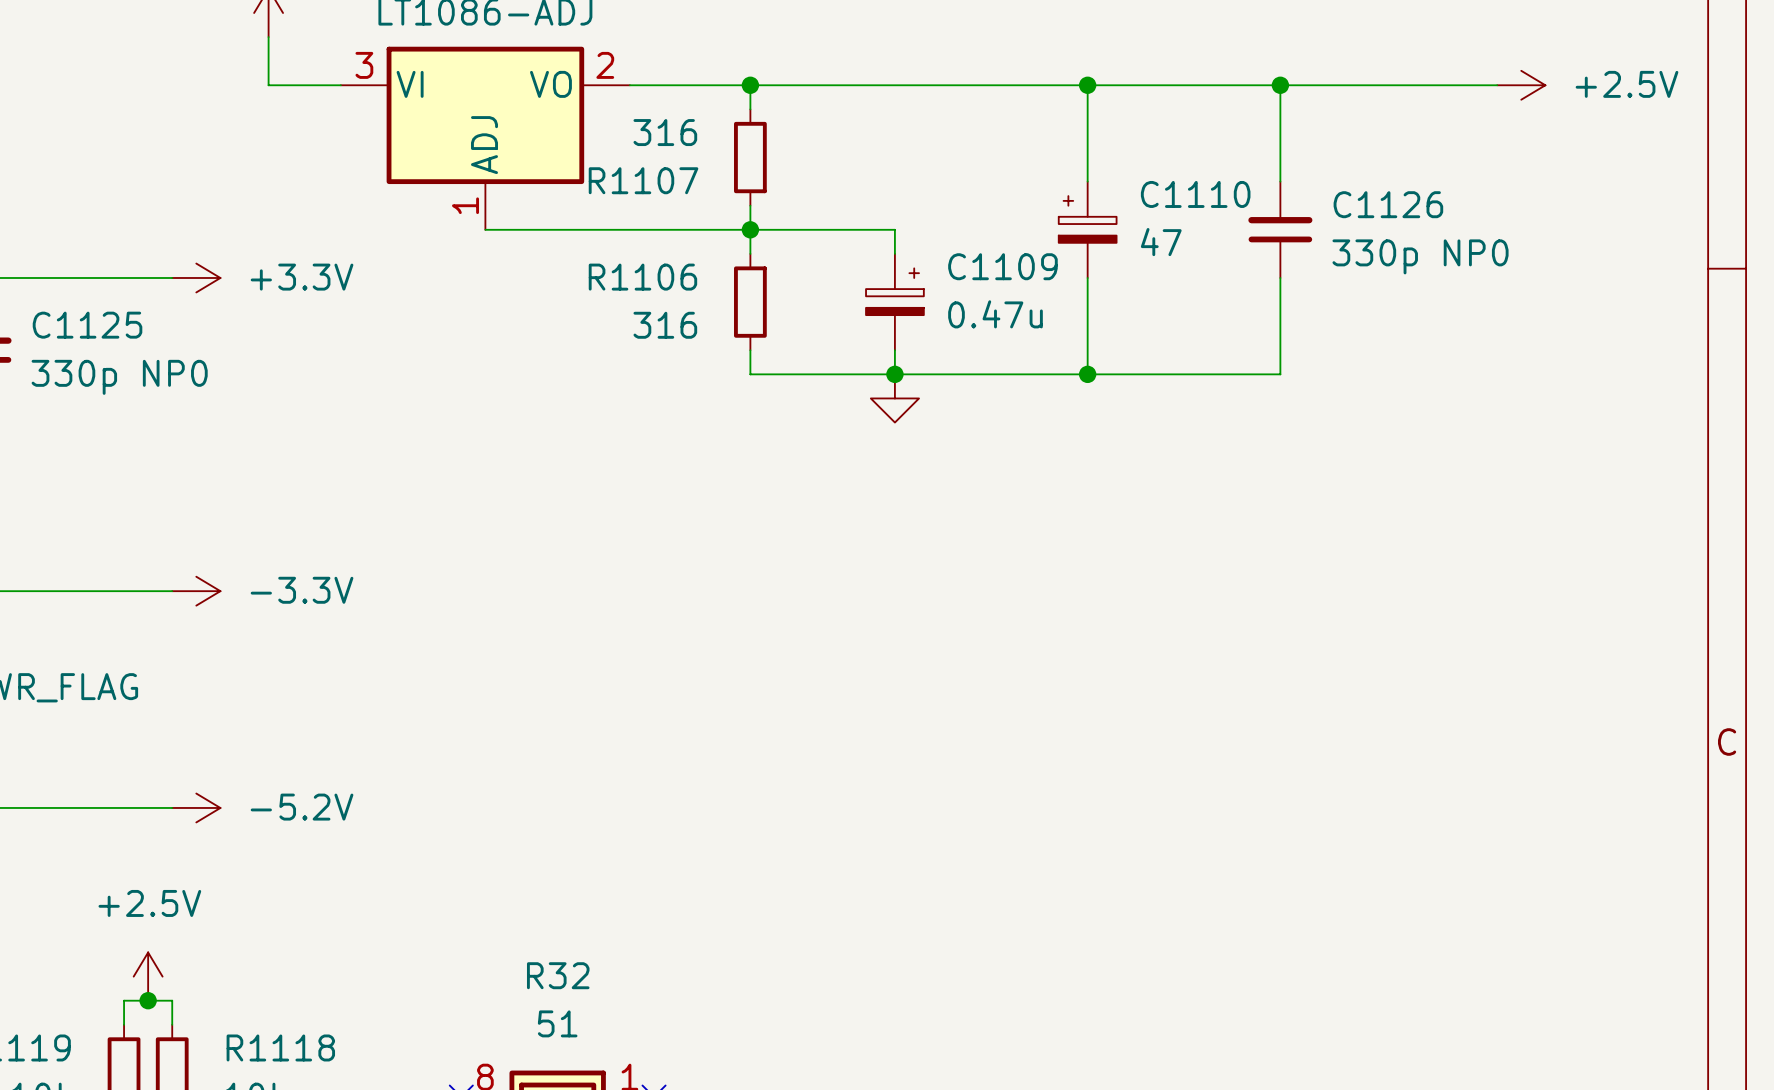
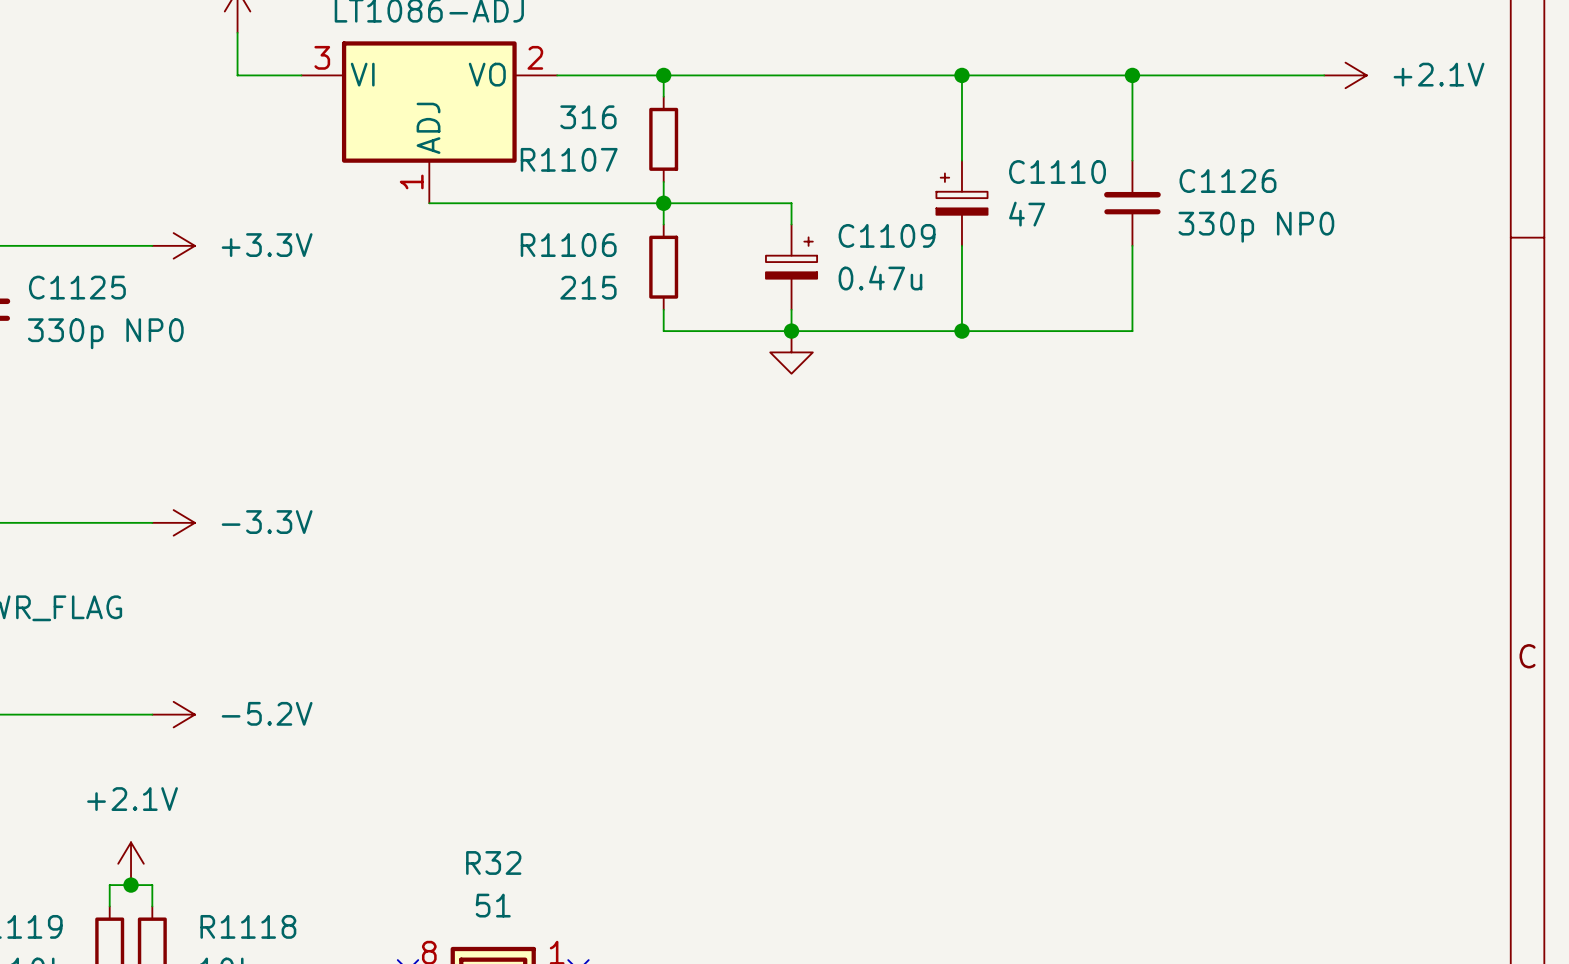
power symbol: +2.5V (1521, 85) -> +2.1V (1345, 75)
R1106 value: 316 (665, 325) -> 215 (588, 287)
power symbol: +2.5V (148, 976) -> +2.1V (131, 863)

